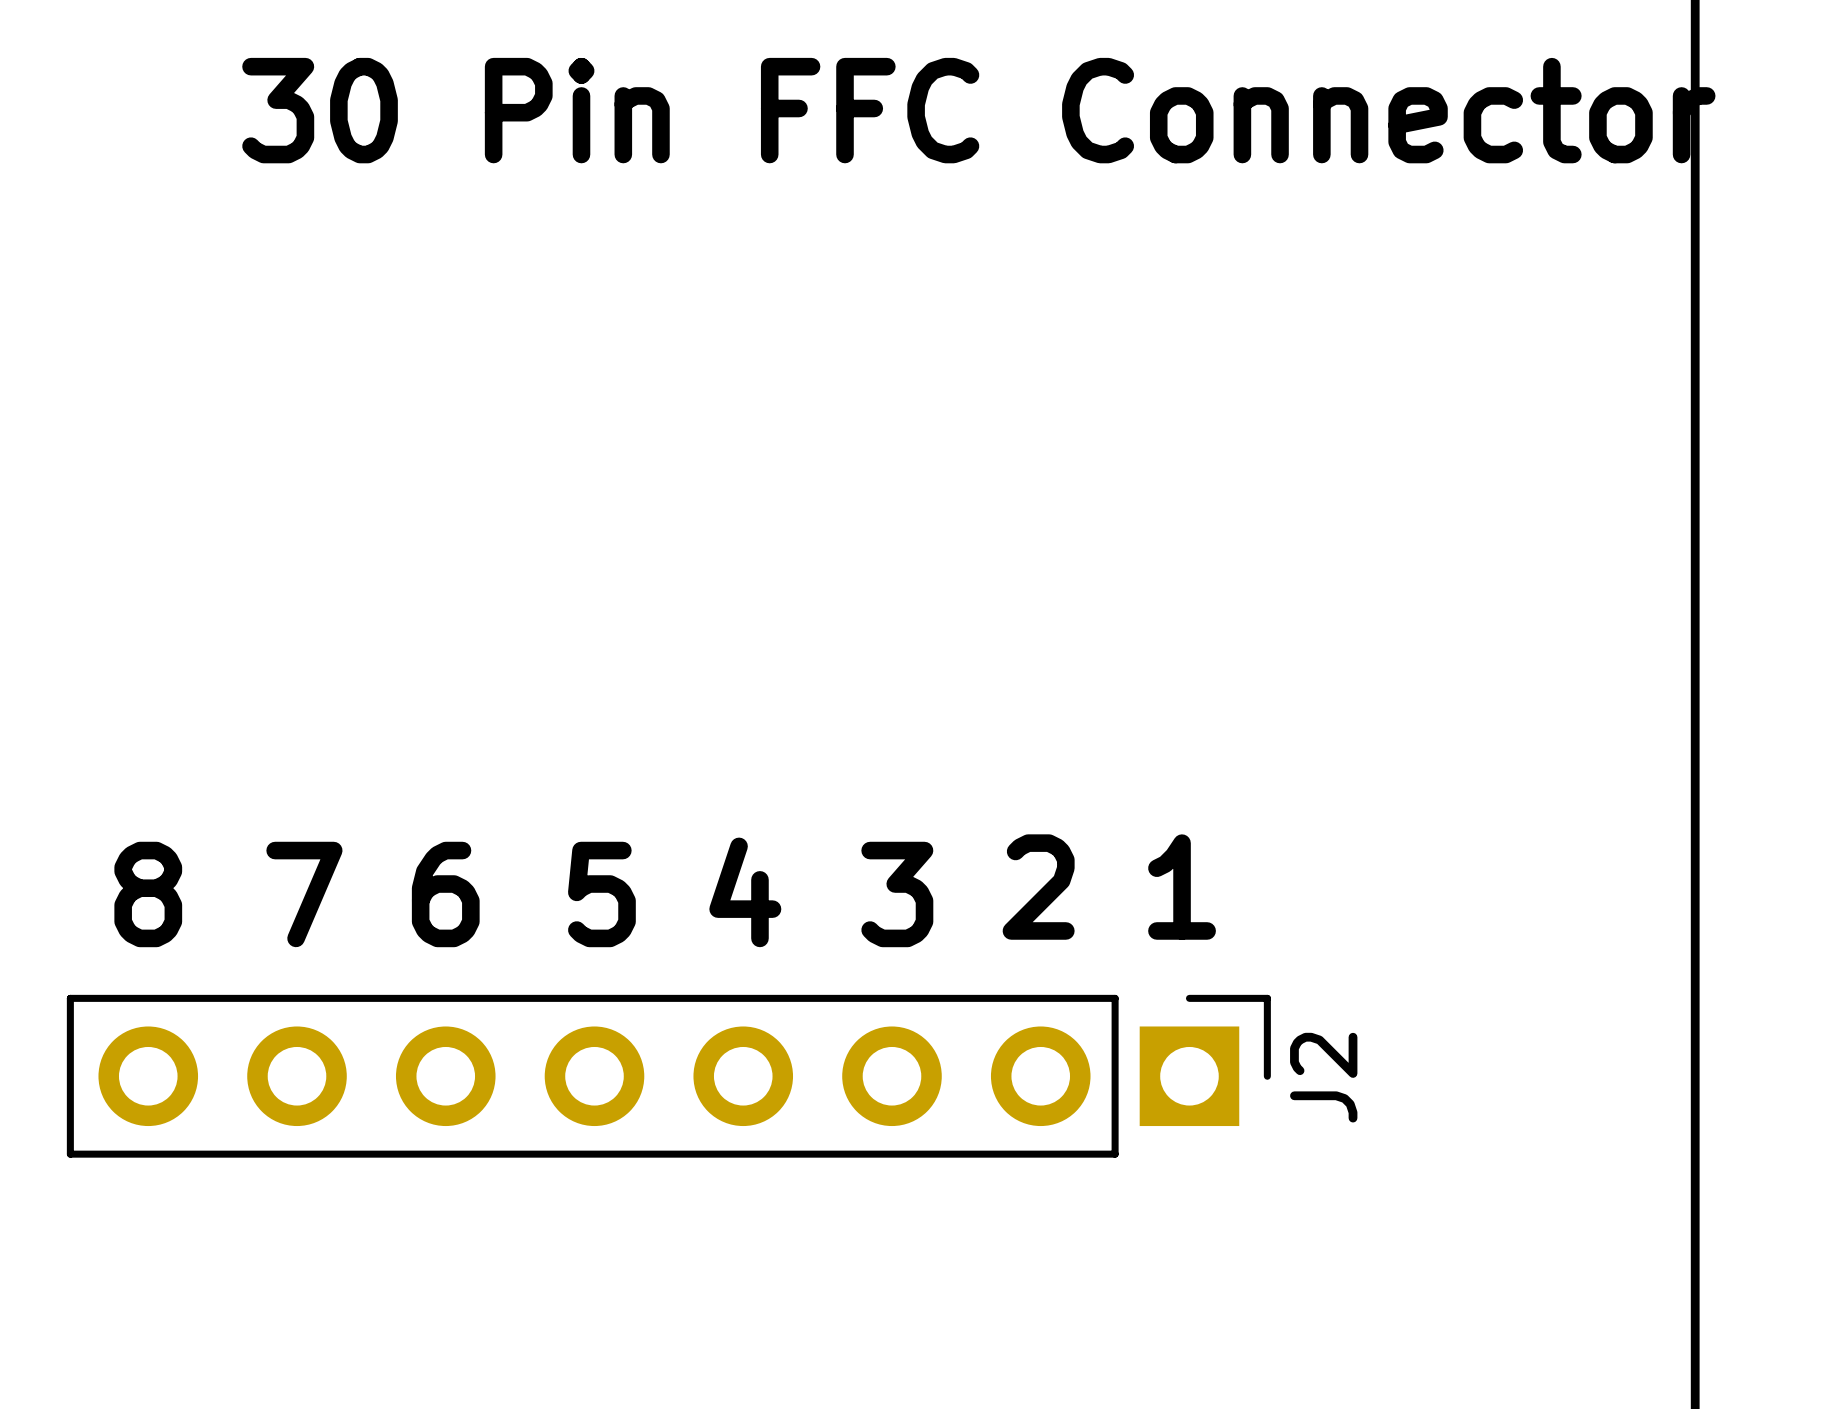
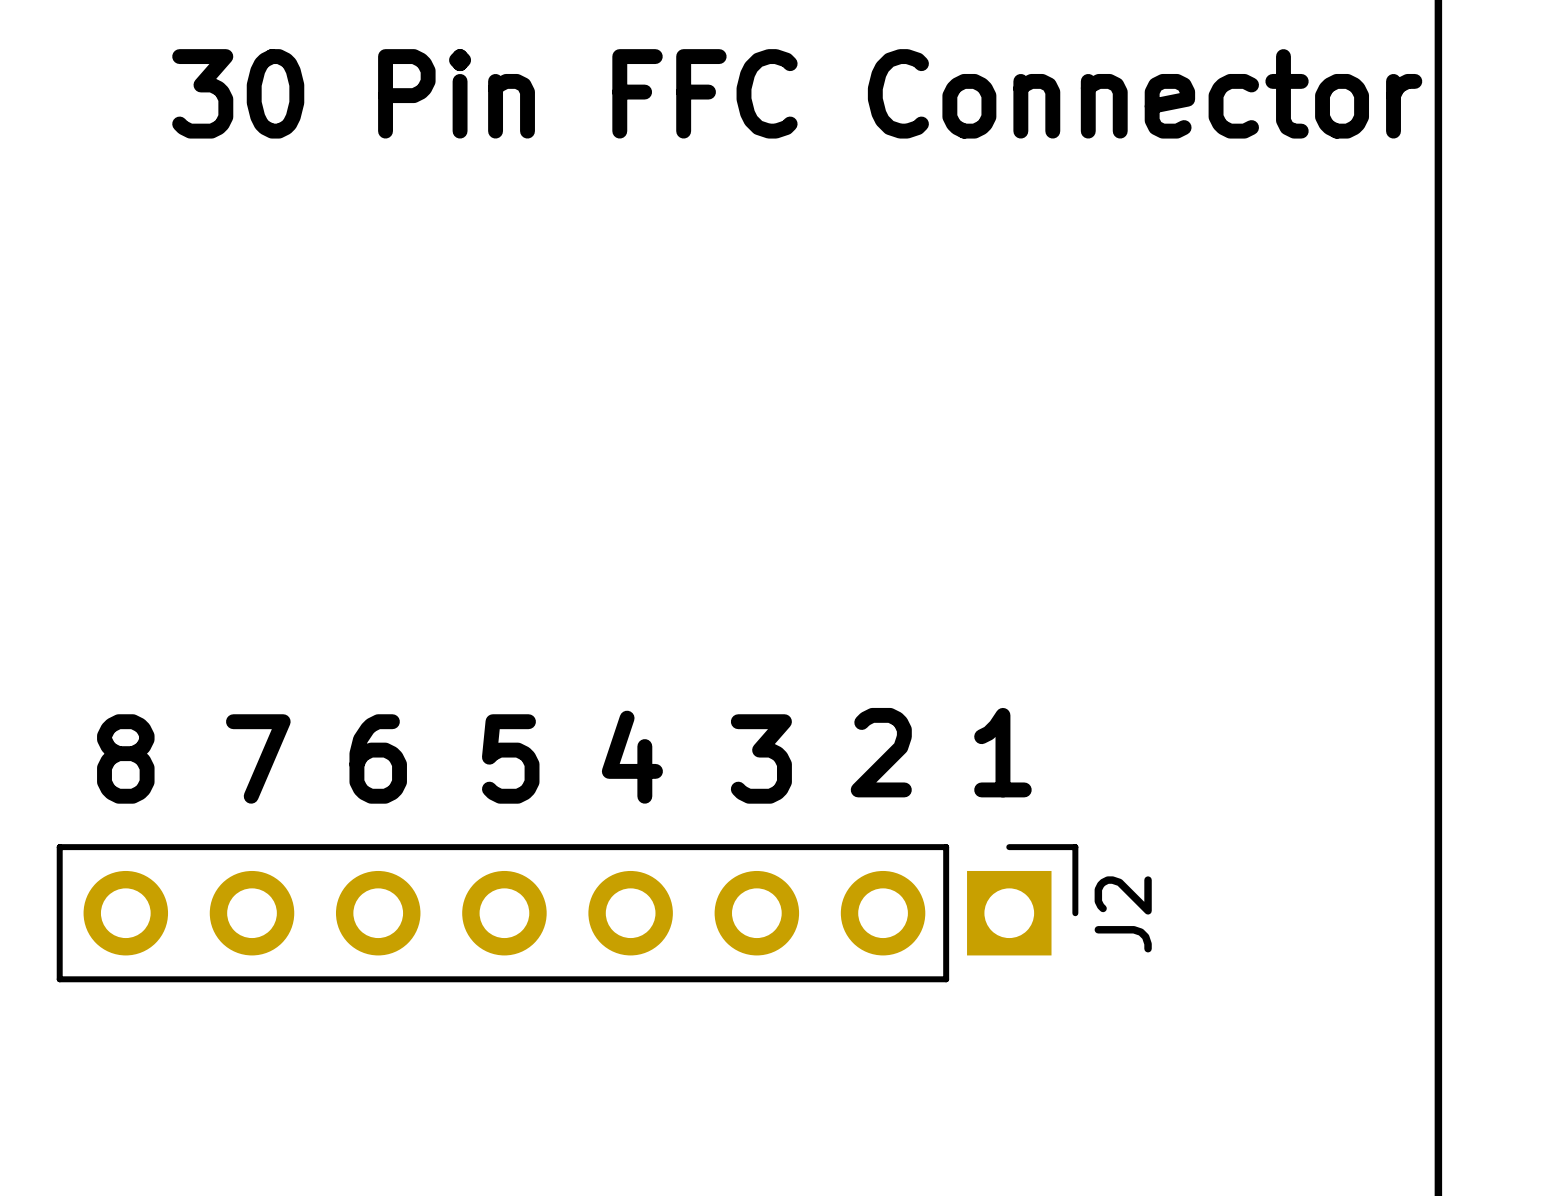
text position: 30 Pin FFC Connector (978, 110) -> 30 Pin FFC Connector (797, 93)

